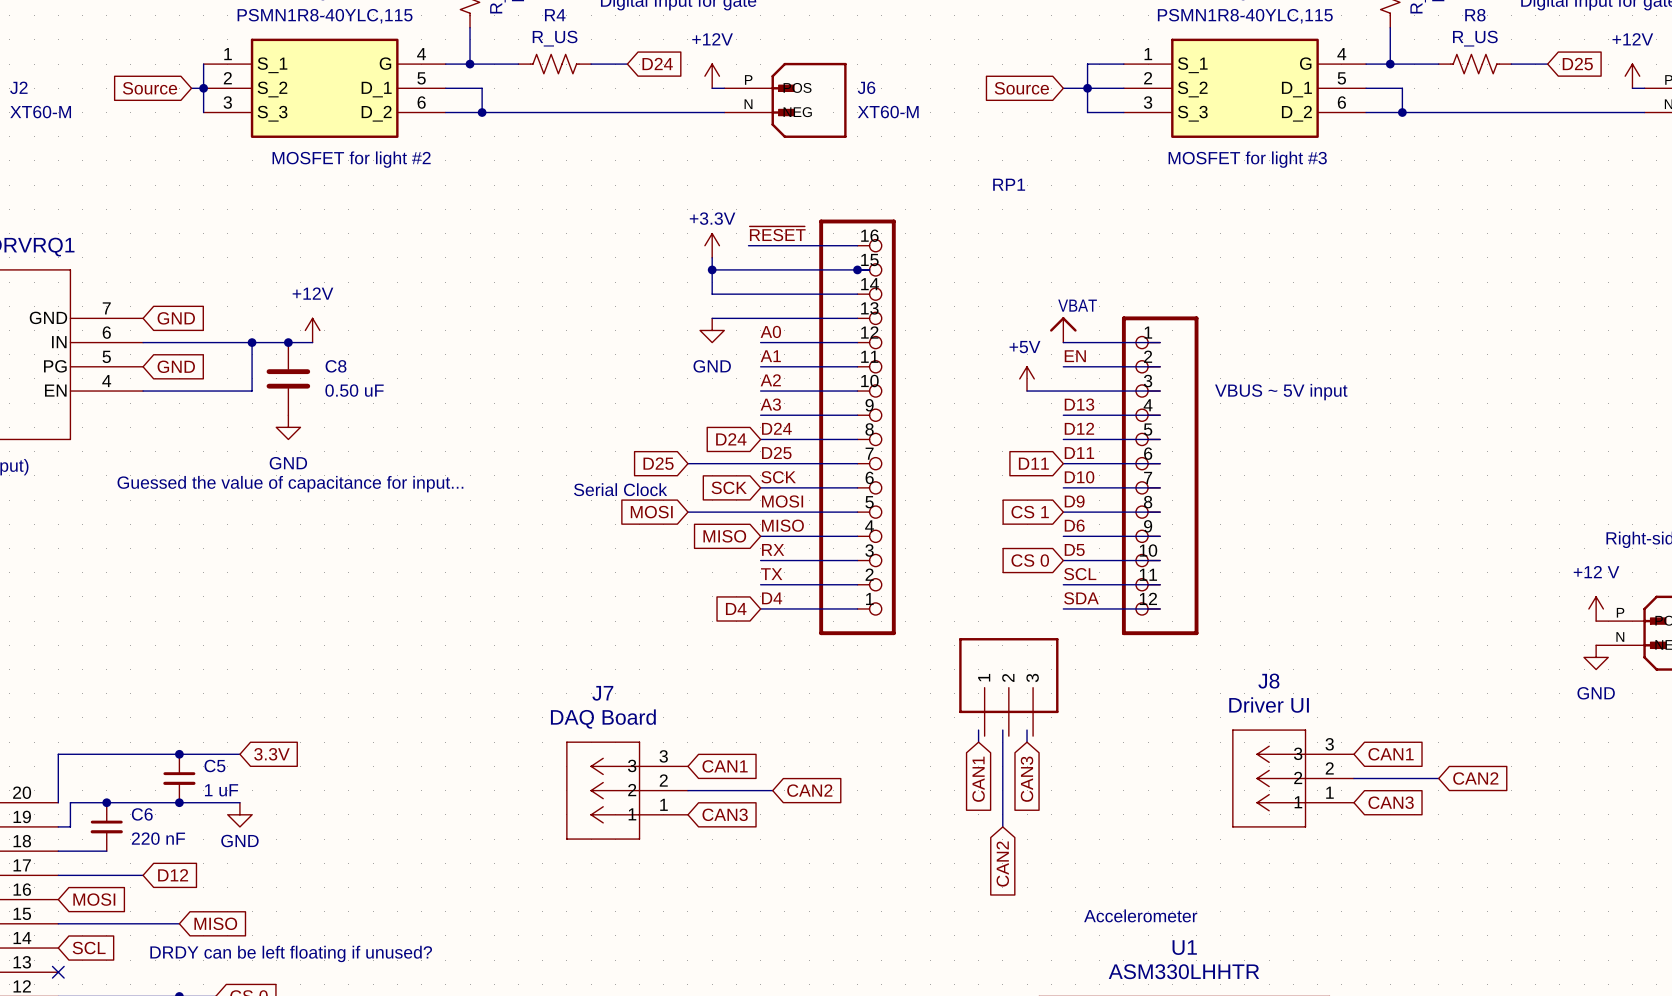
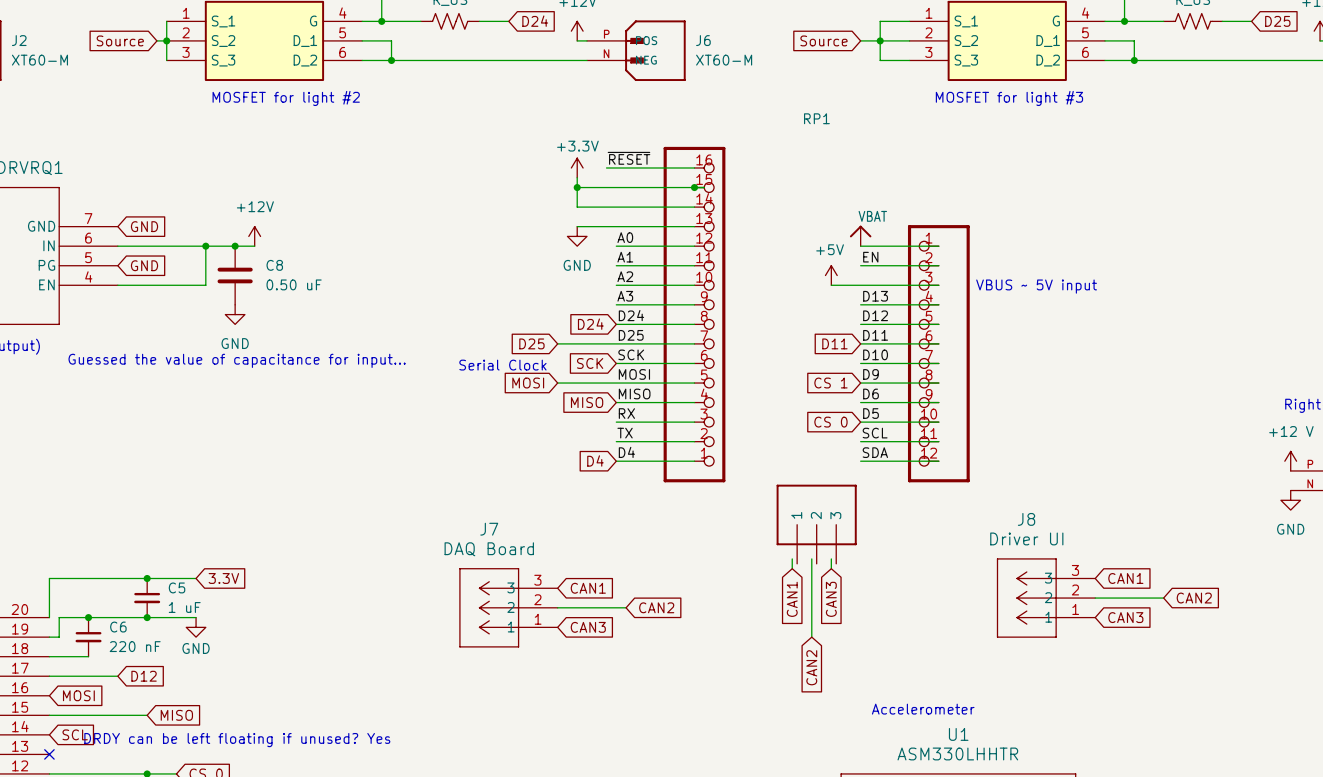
text: DRDY can be left floating if unused? (291, 953) -> DRDY can be left floating if unused? Yes (237, 740)

